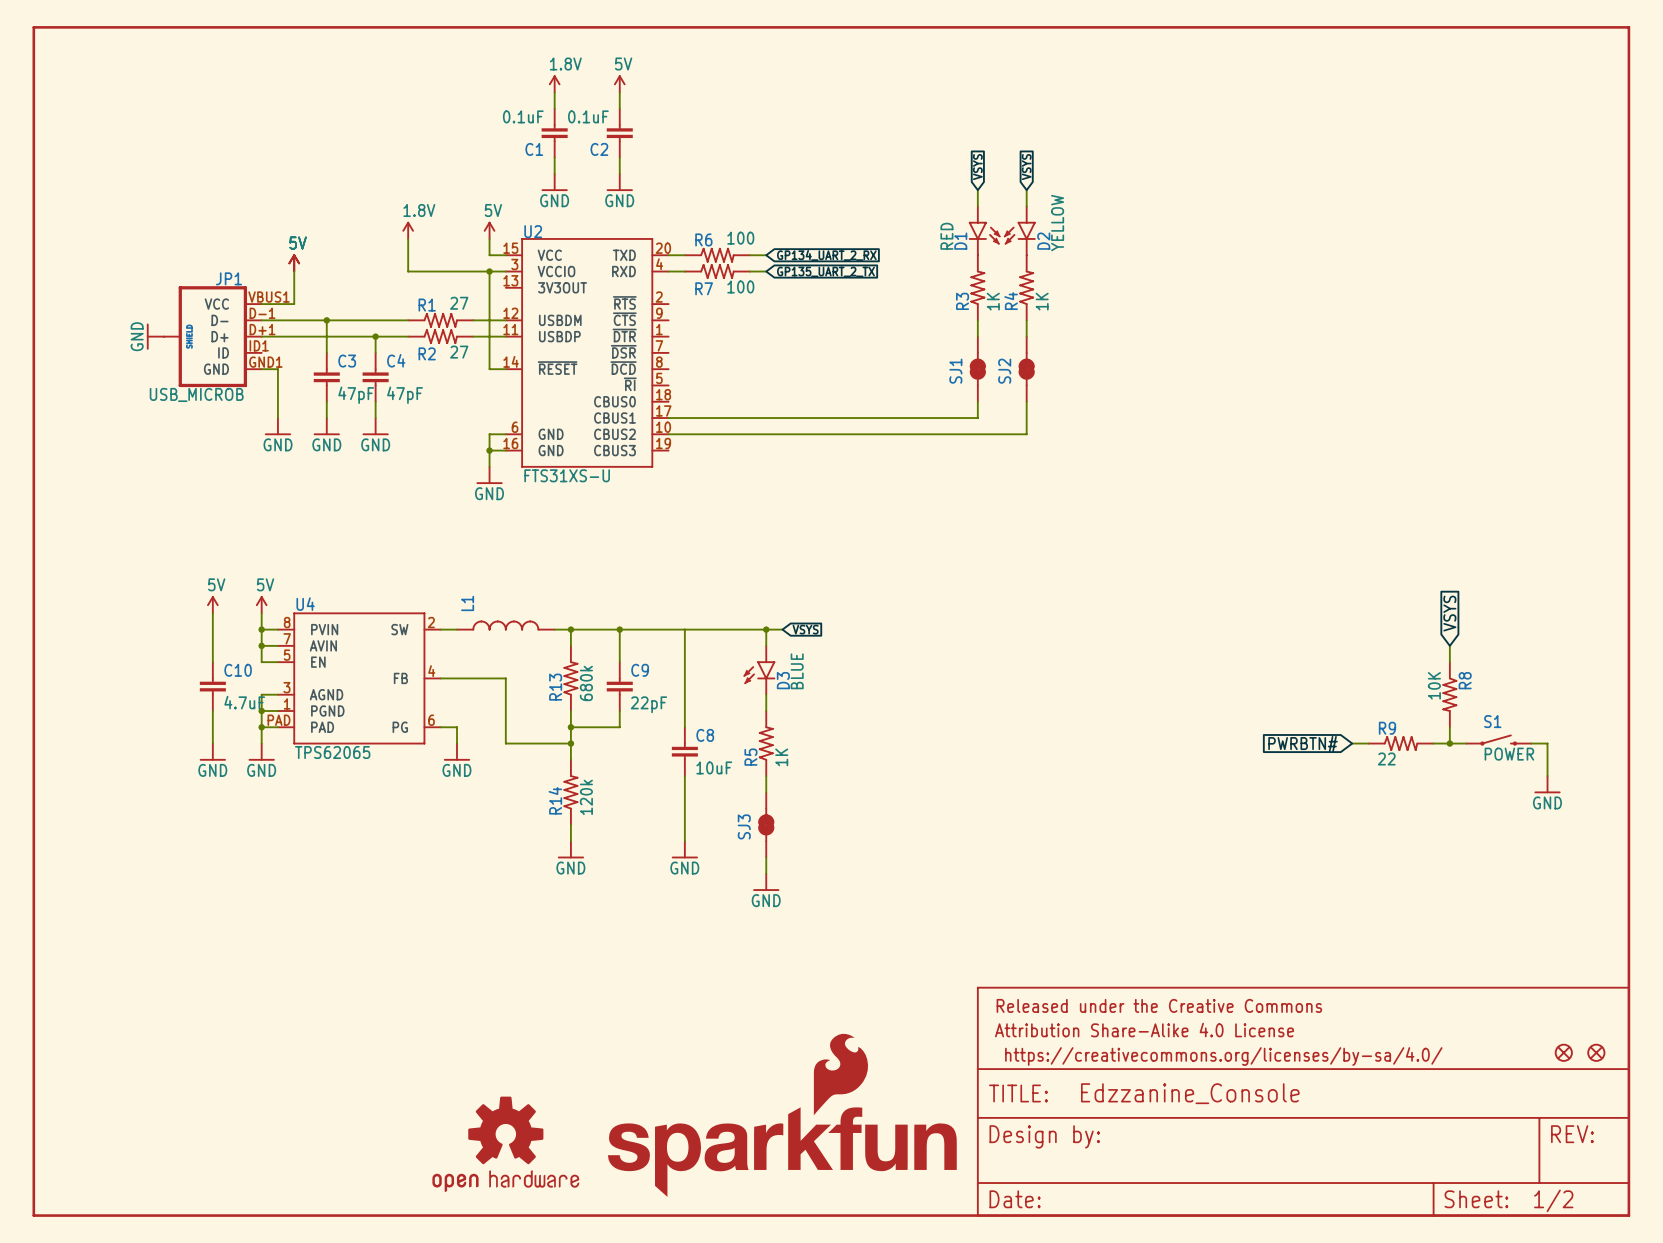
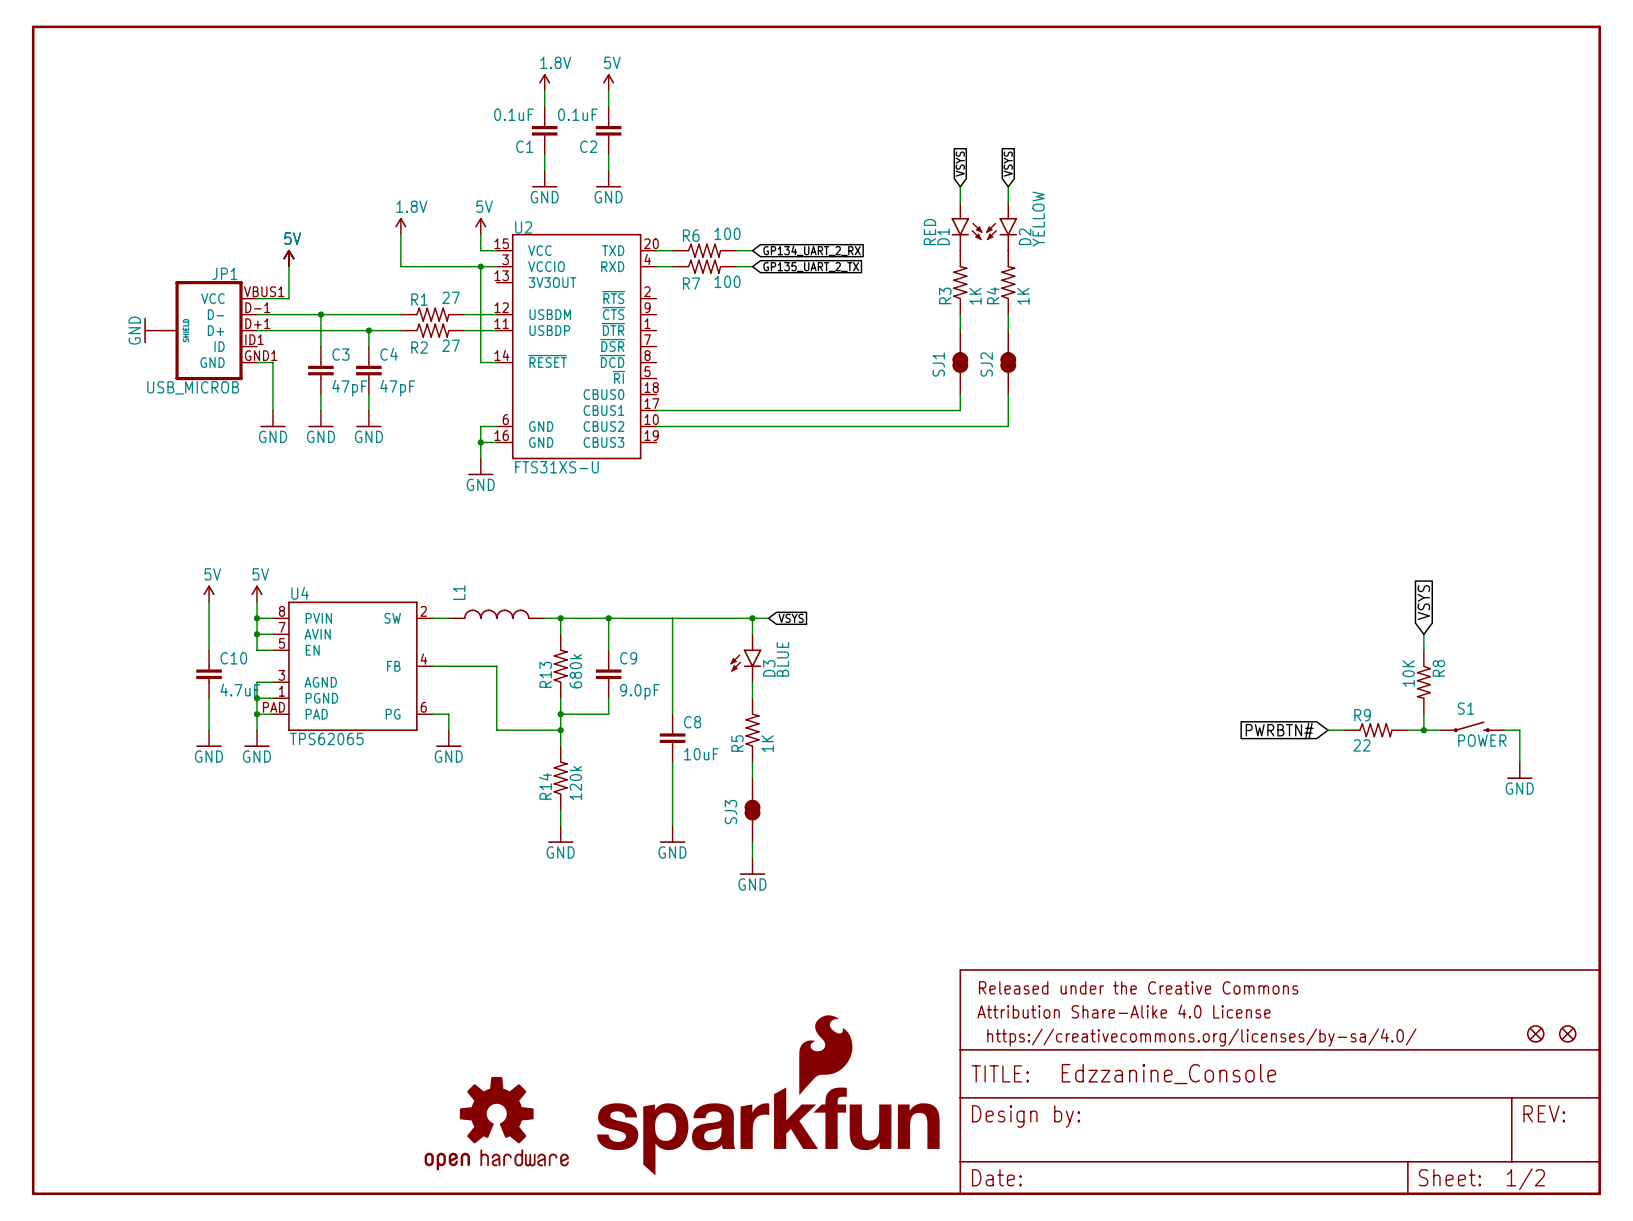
C9 value: 22pF (648, 704) -> 9.0pF (639, 692)

